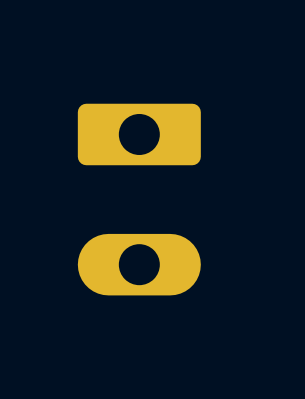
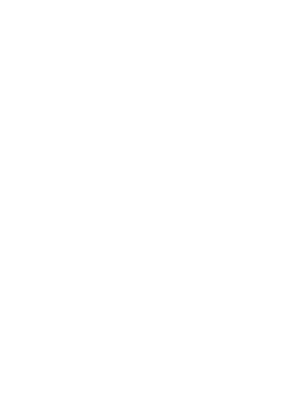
part: (139, 199) -> none

